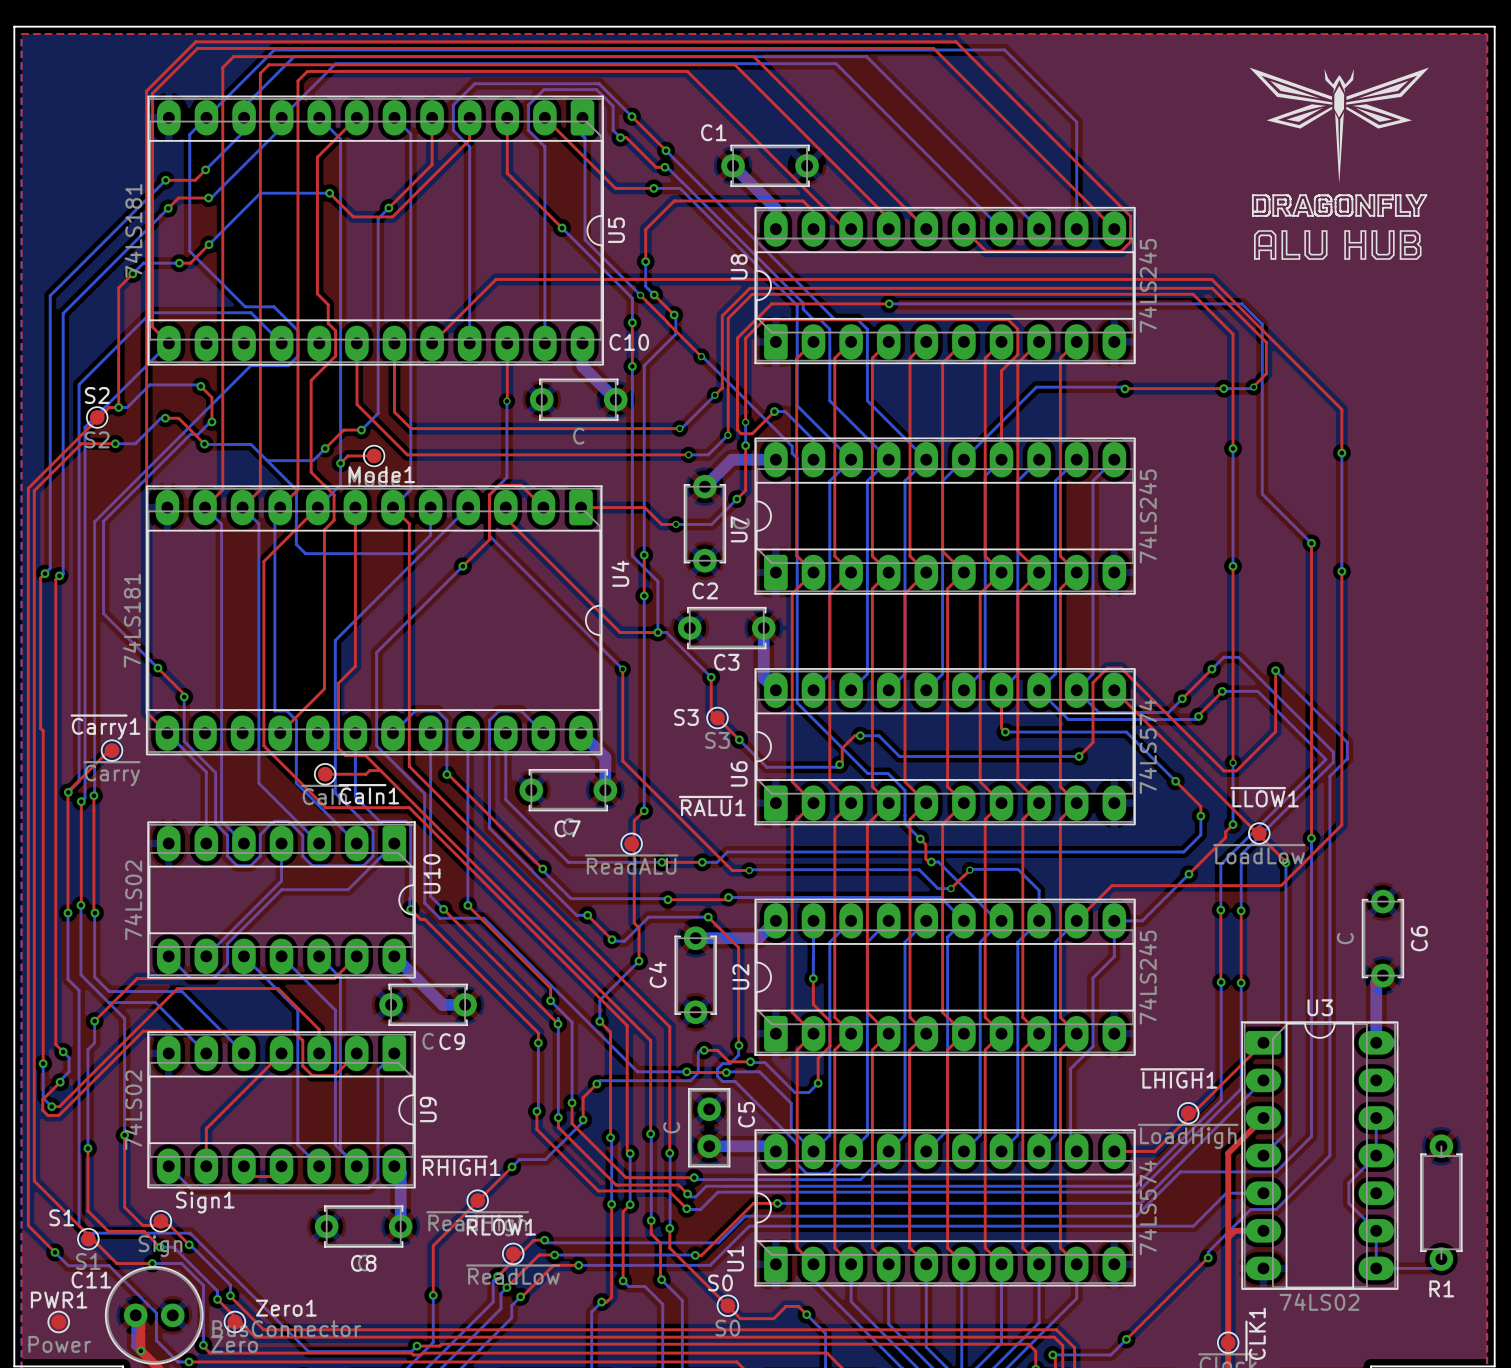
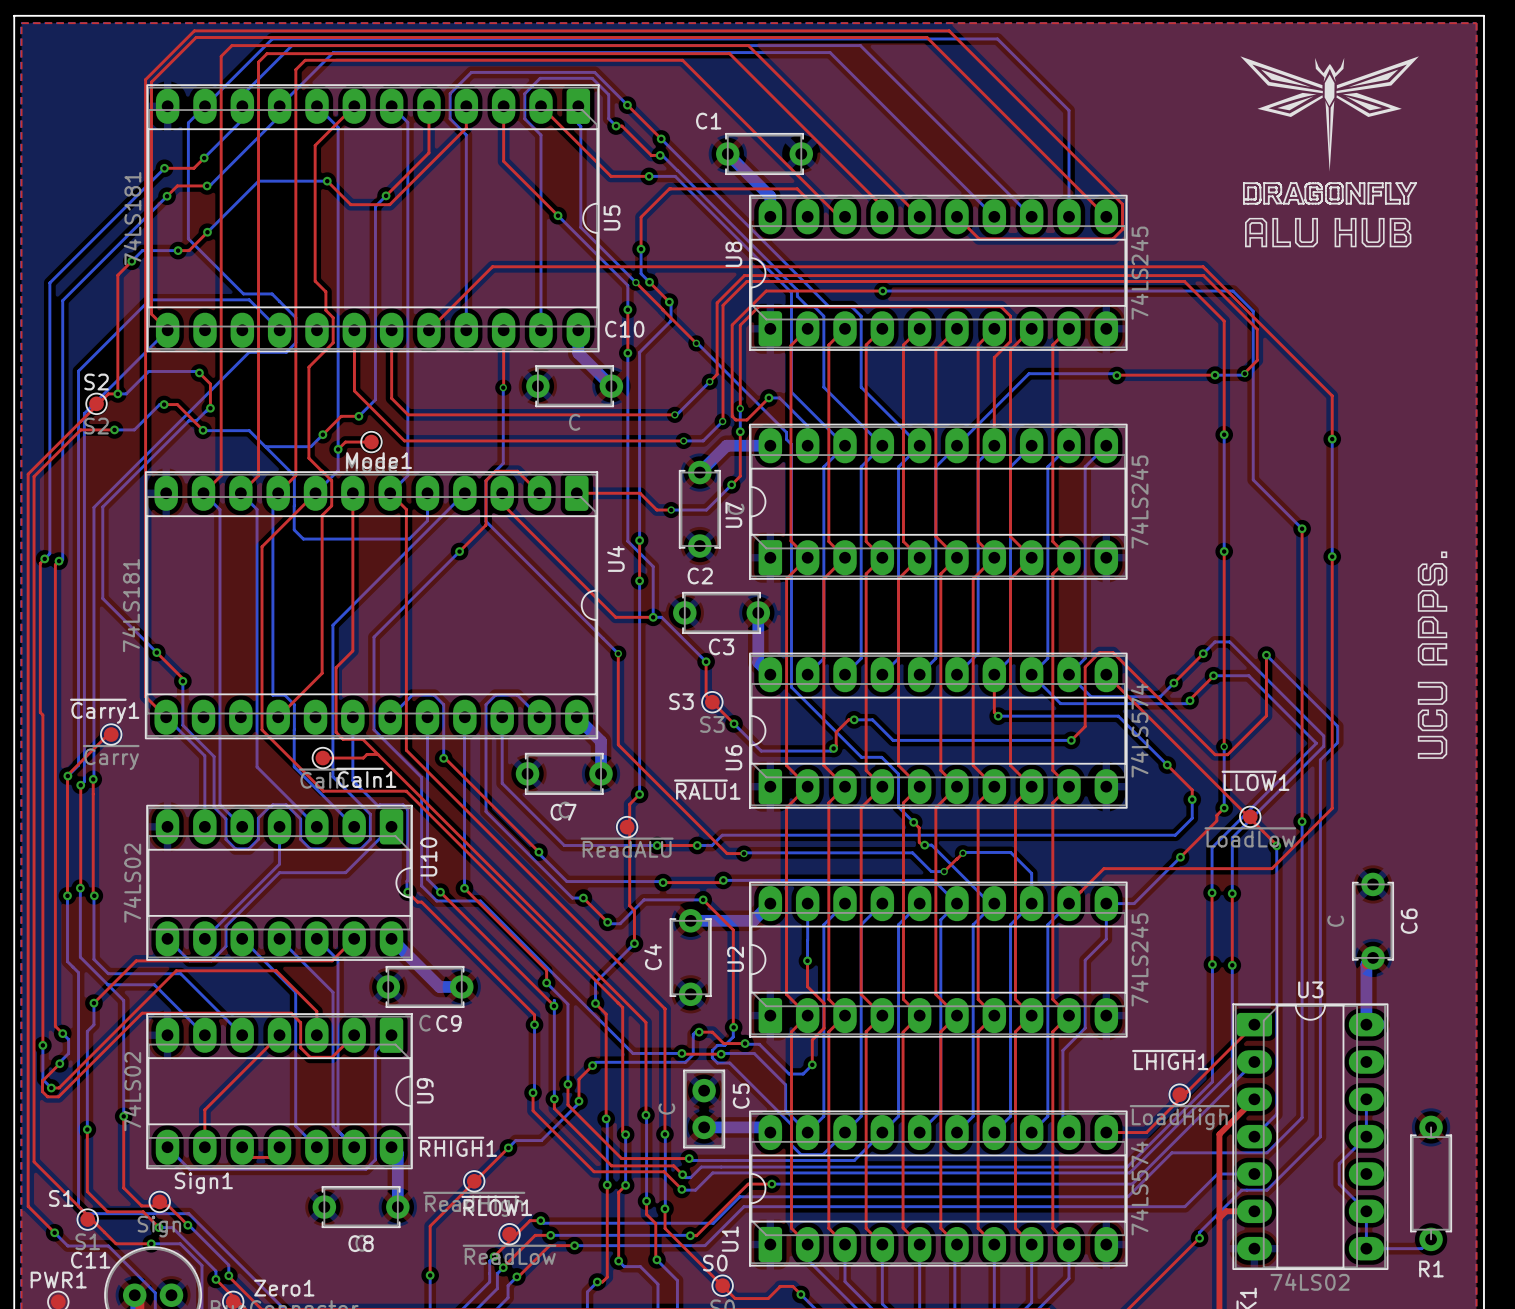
drawing: none -> [1417, 551, 1448, 759]

